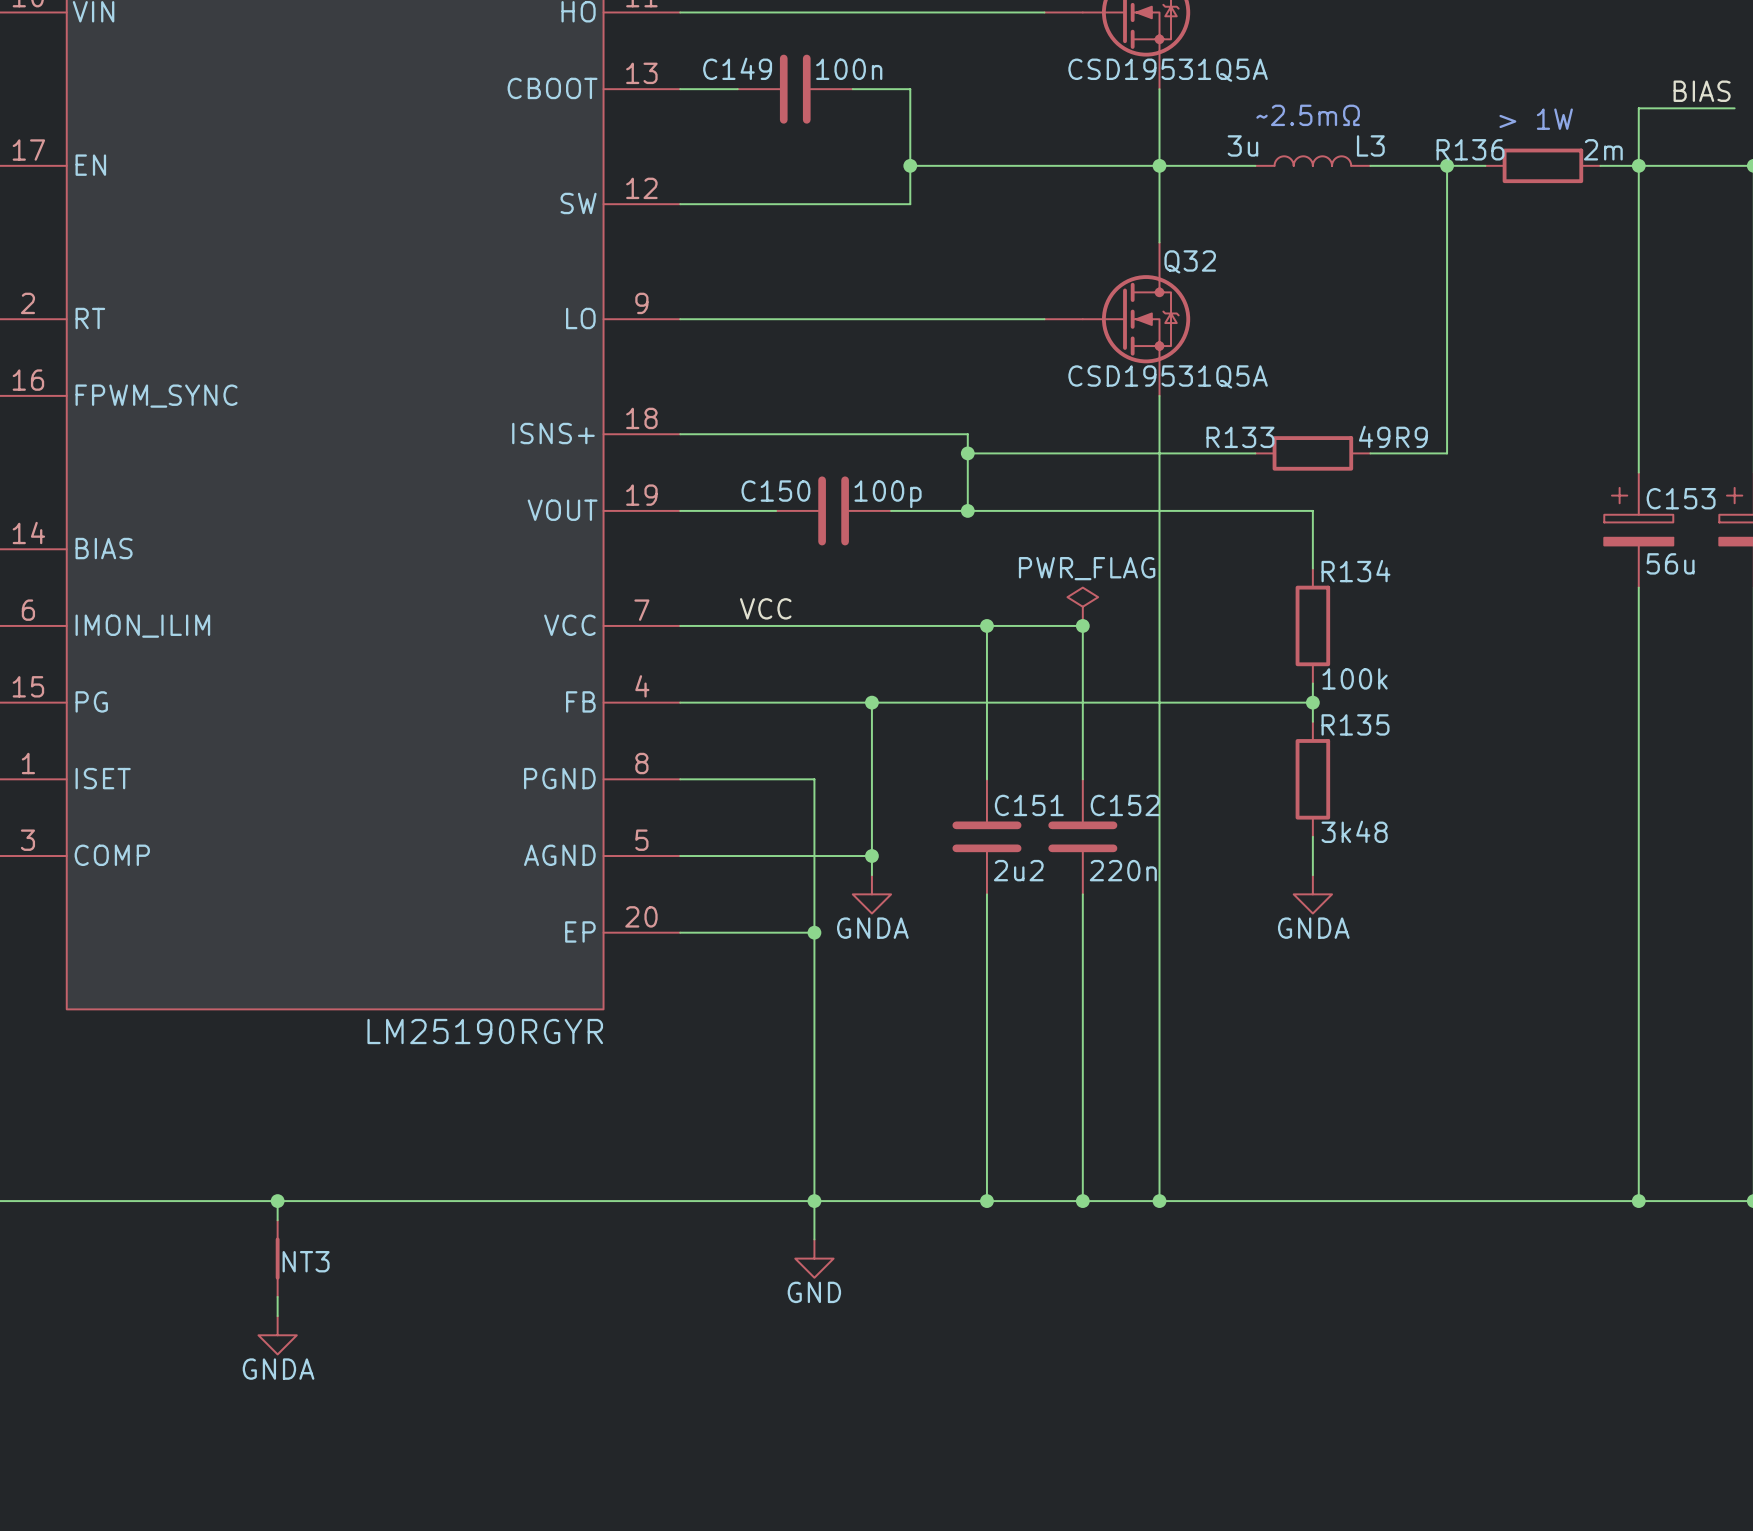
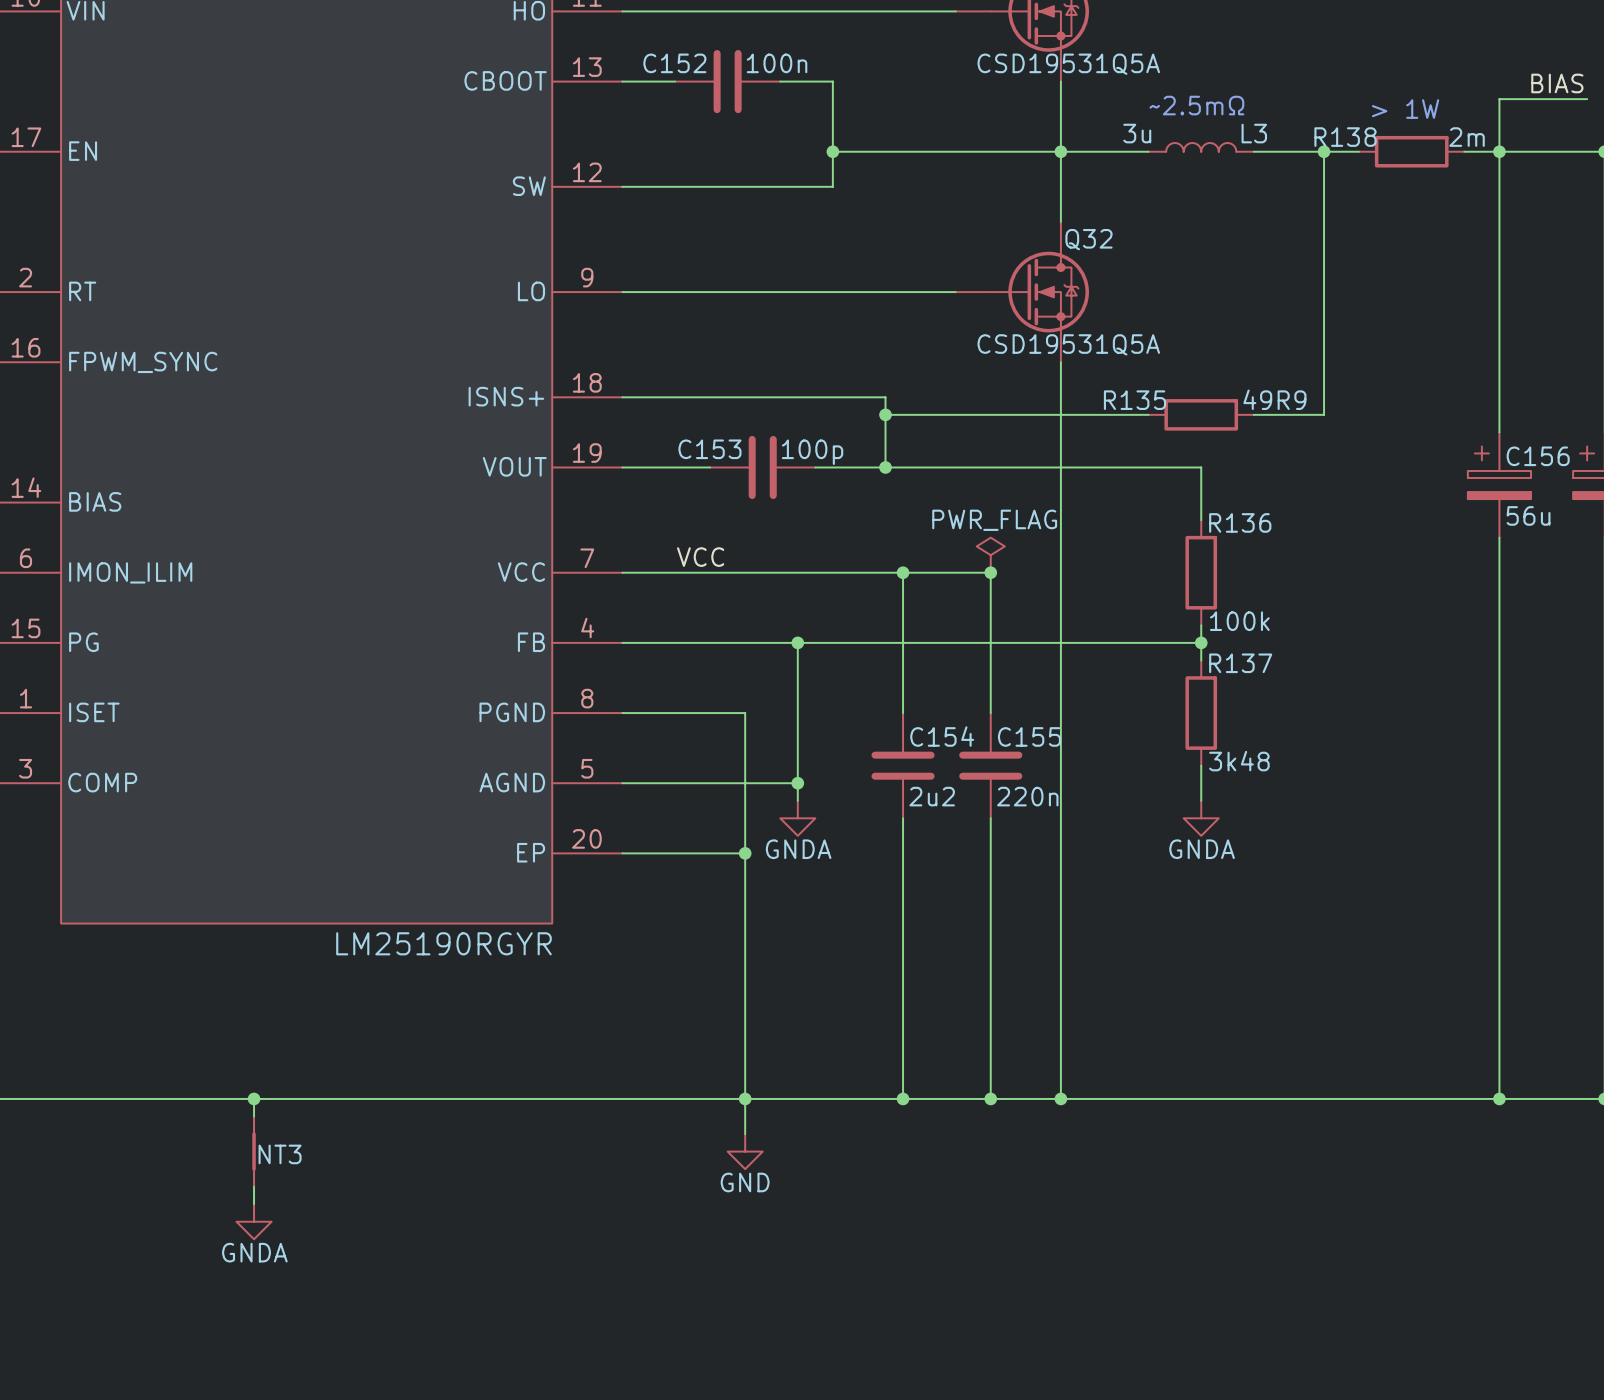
C149 name: C149 (737, 68) -> C152 (674, 63)
R136 name: R136 (1470, 149) -> R138 (1345, 137)
R133 name: R133 (1240, 437) -> R135 (1135, 400)
C150 name: C150 (775, 491) -> C153 (709, 449)
C153 name: C153 (1681, 498) -> C156 (1538, 456)
R134 name: R134 (1355, 571) -> R136 (1240, 522)
R135 name: R135 (1355, 724) -> R137 (1240, 663)
C151 name: C151 (1029, 805) -> C154 (942, 736)
C152 name: C152 (1125, 805) -> C155 (1029, 736)

